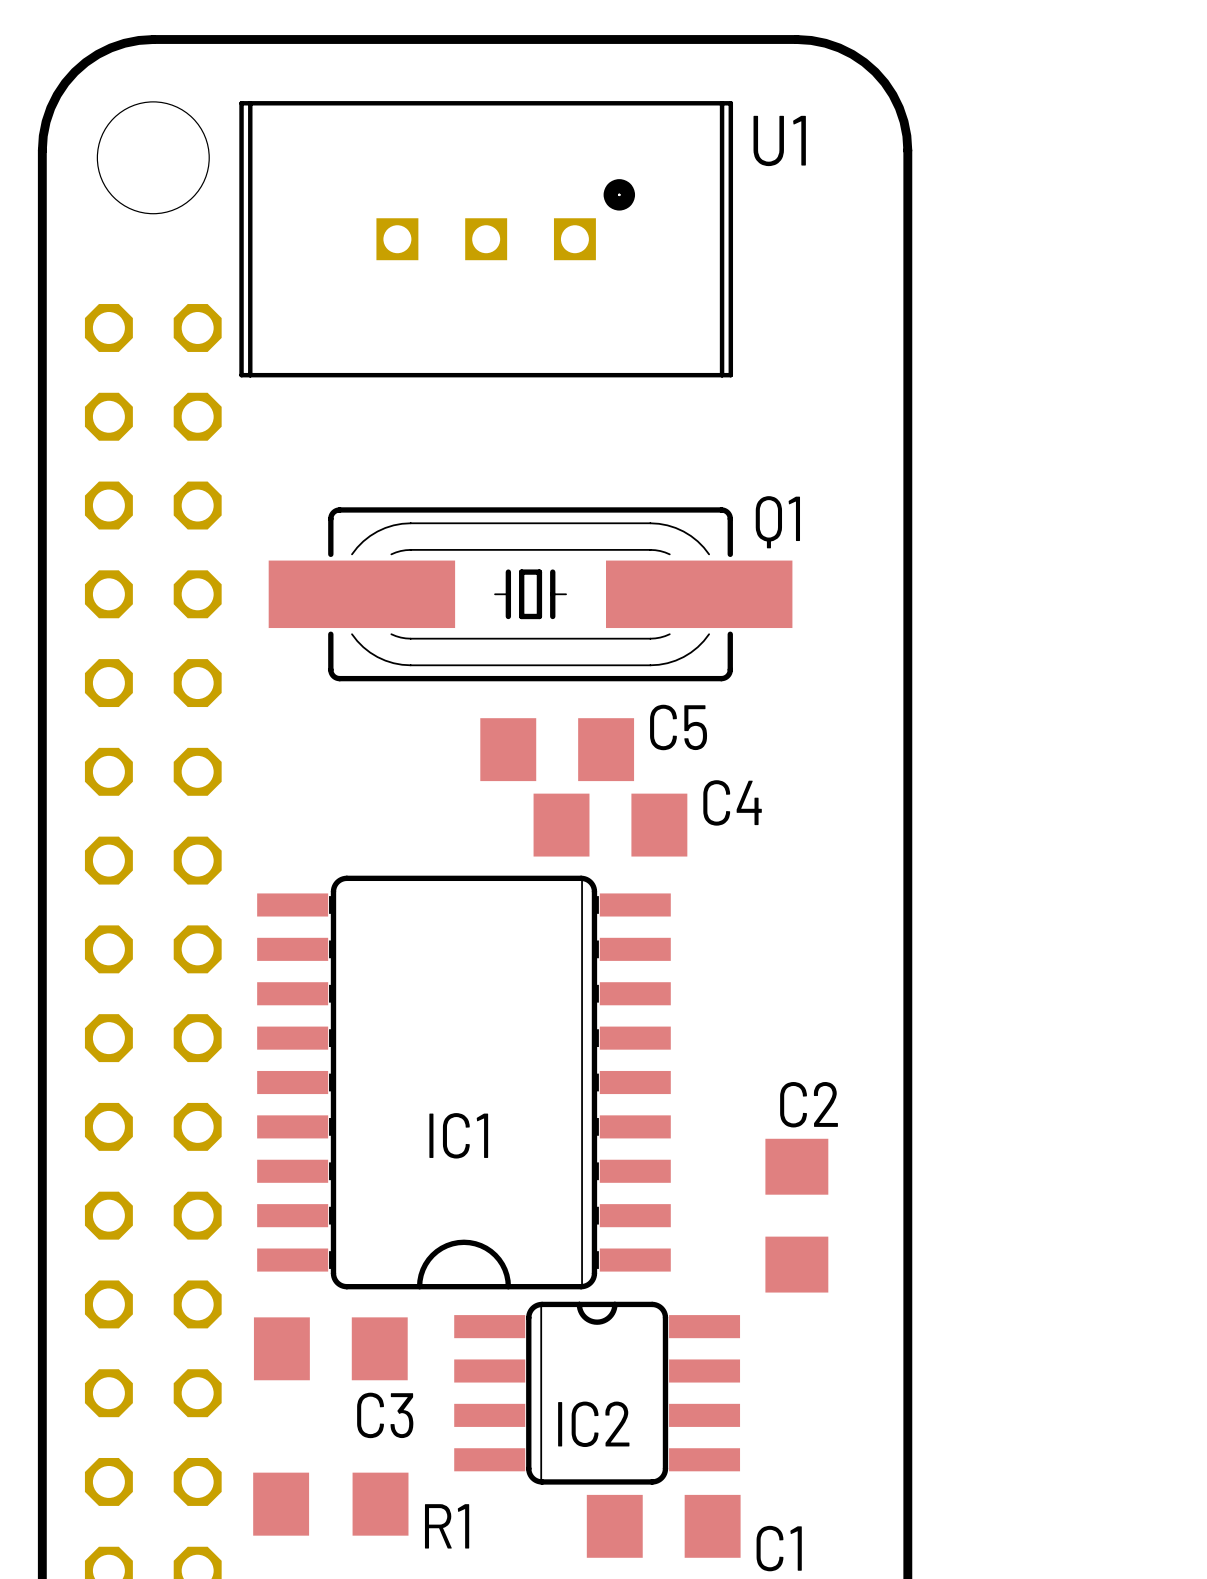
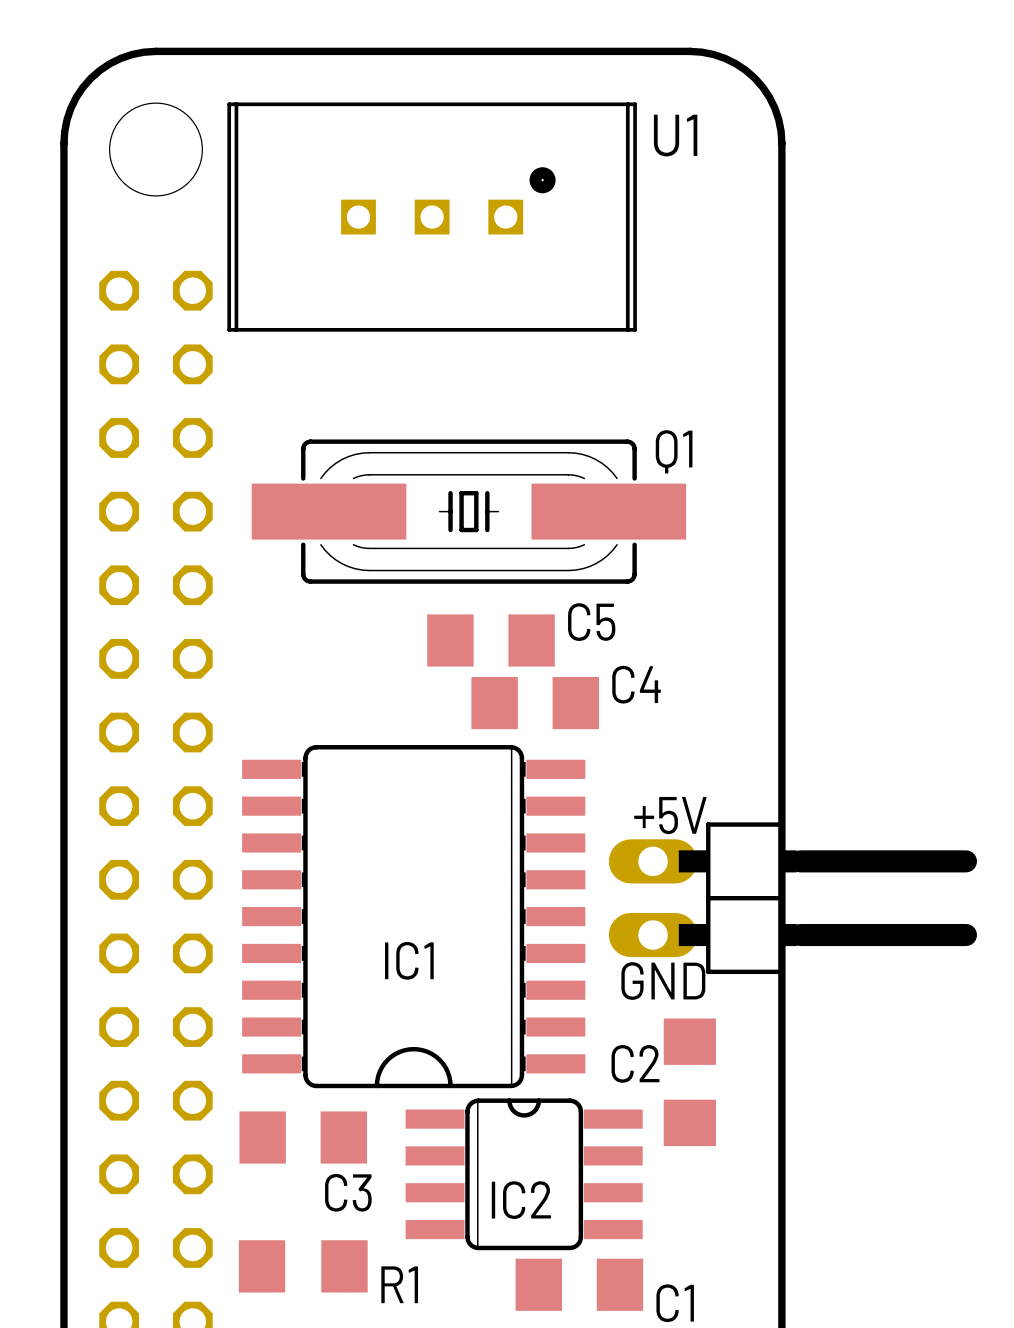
text: none -> +5V (670, 815)
part: none -> (792, 898)
C2 name position: C2 (809, 1104) -> C2 (635, 1063)
text: none -> GND (663, 981)
C2 position: (796, 1215) -> (689, 1082)

